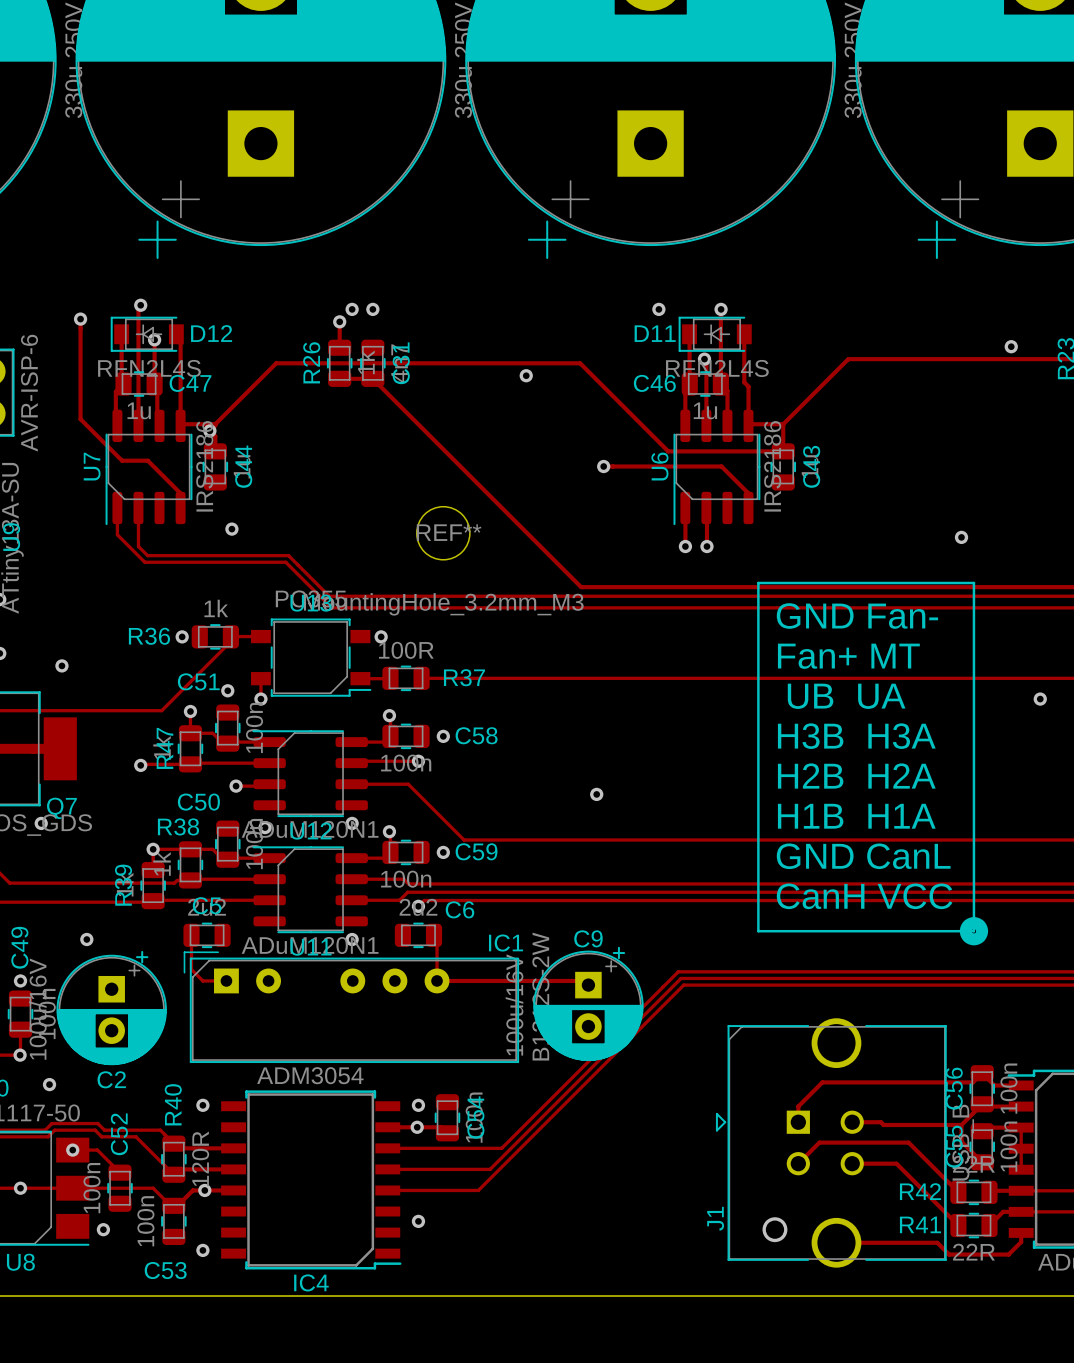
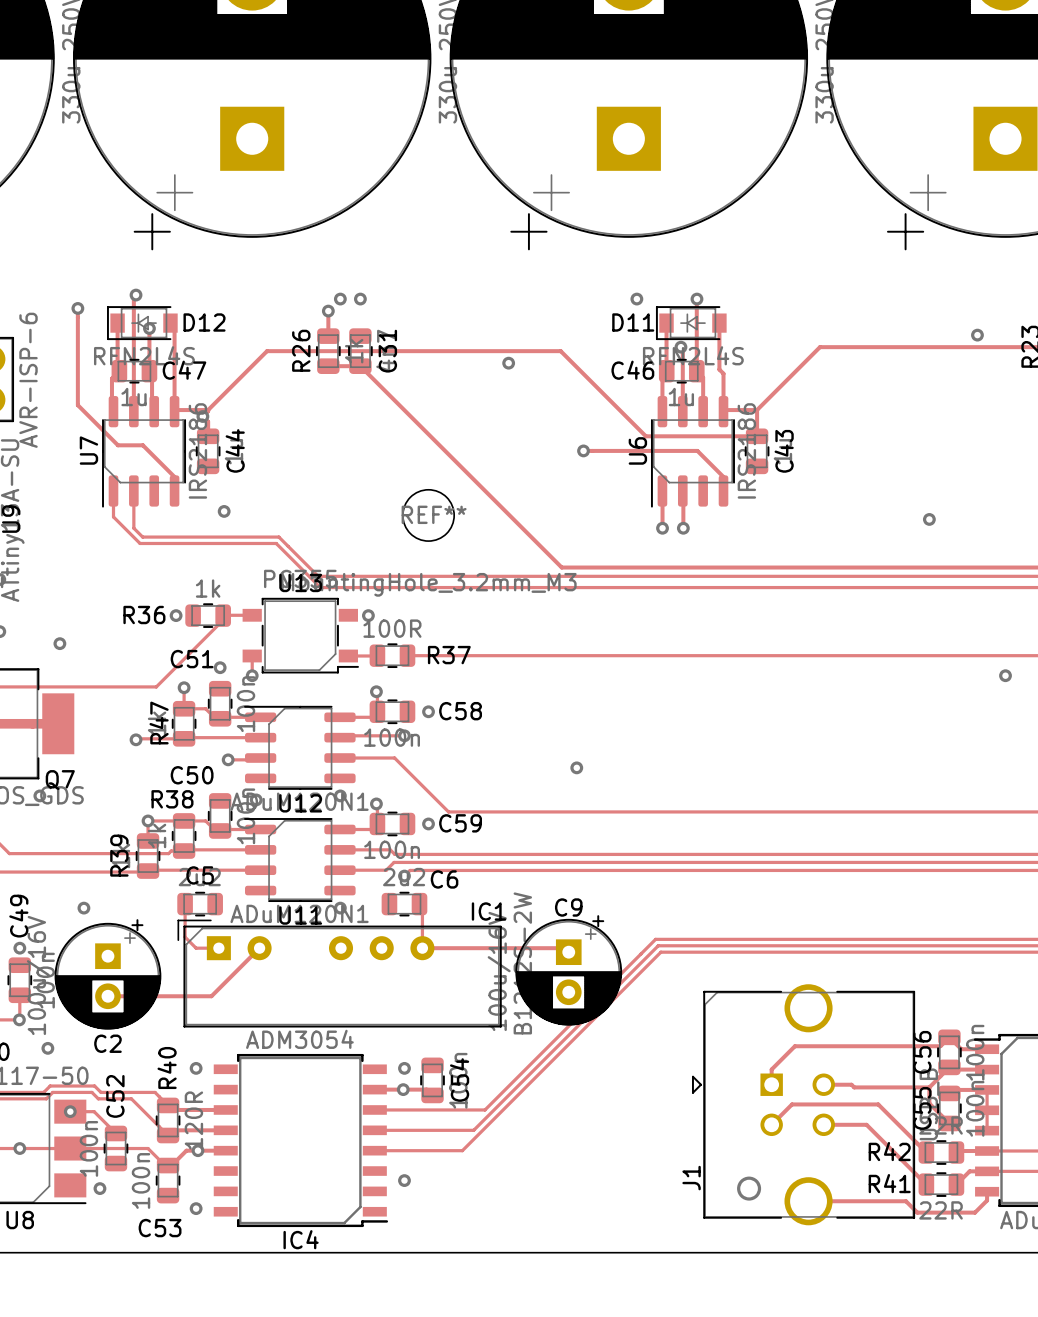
line: (758, 582) (758, 931) (973, 931) (973, 582) (758, 582) -> none
text: GND Fan- (857, 616) -> none
text: Fan+ MT (848, 656) -> none
text: UB UA (846, 696) -> none
text: H3B H3A (856, 736) -> none
text: H2B H2A (856, 776) -> none
text: H1B H1A (856, 816) -> none
text: GND CanL (863, 856) -> none
text: CanH VCC (864, 896) -> none
drawing: [959, 917, 989, 946] -> none
track: none -> (259, 948) (211, 996) (107, 996)

